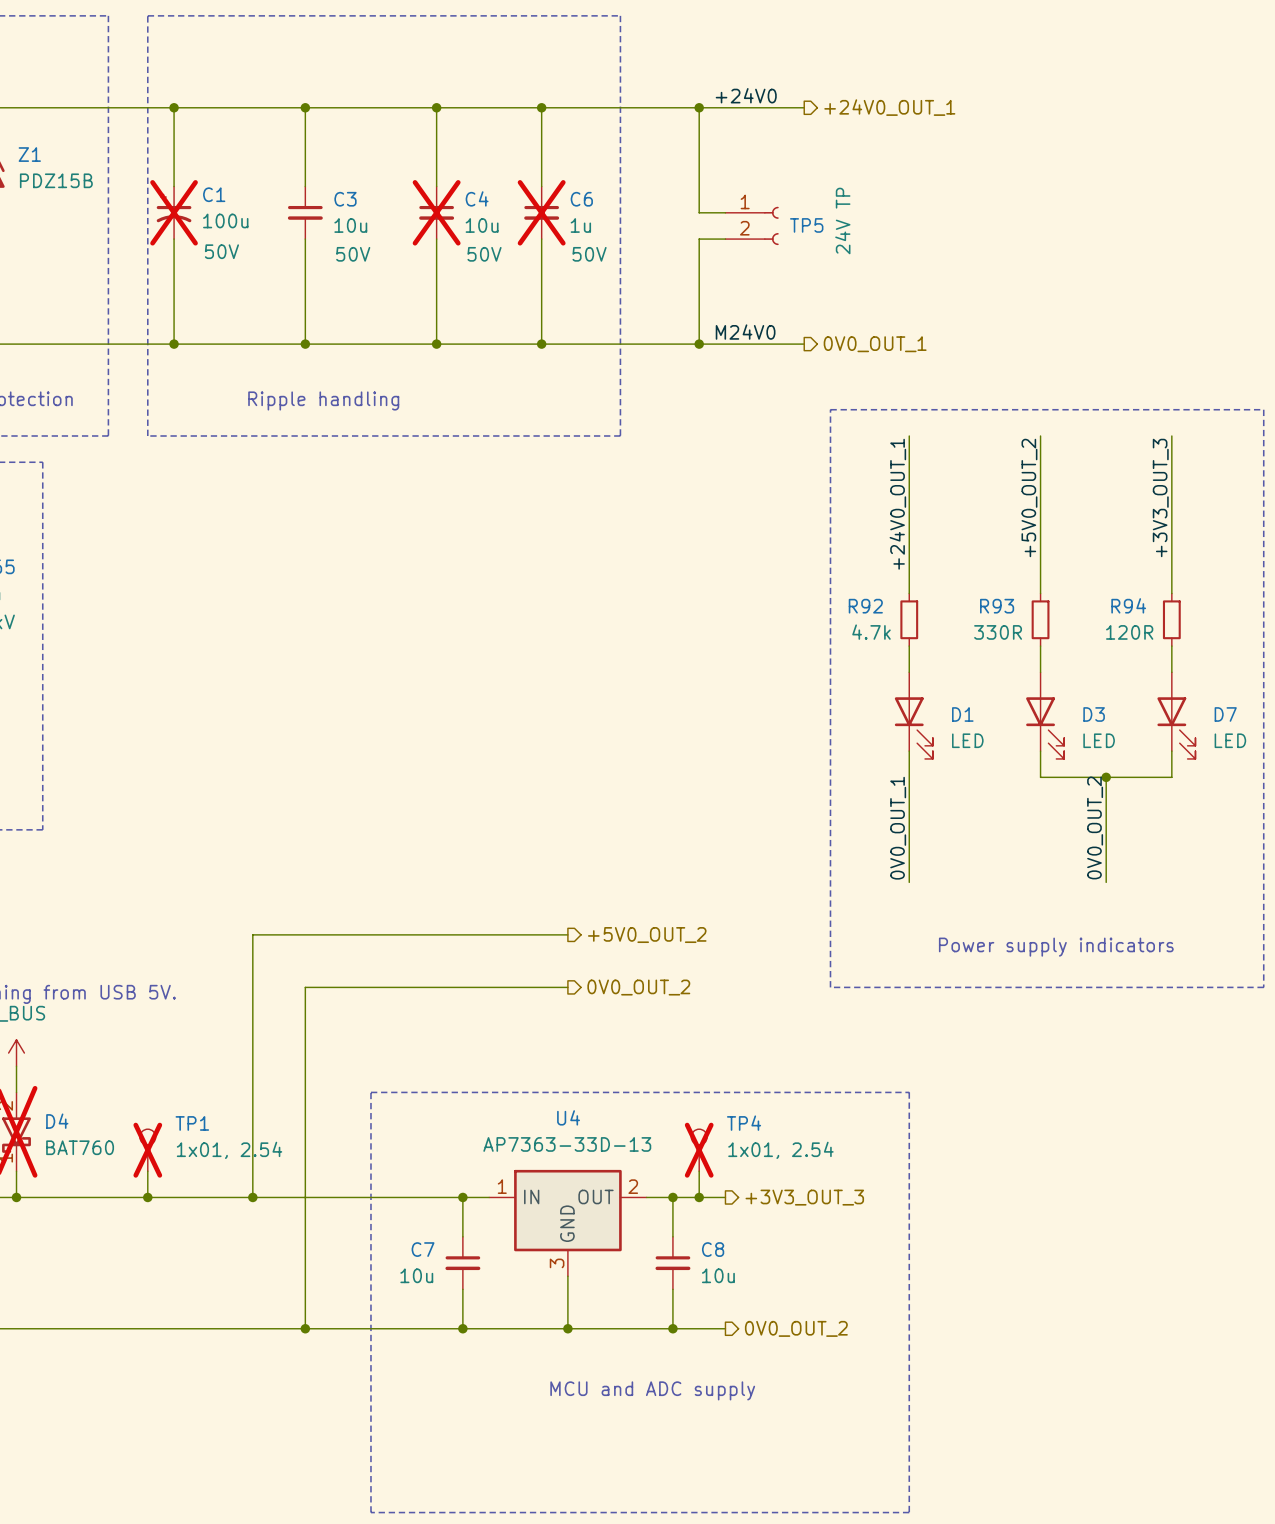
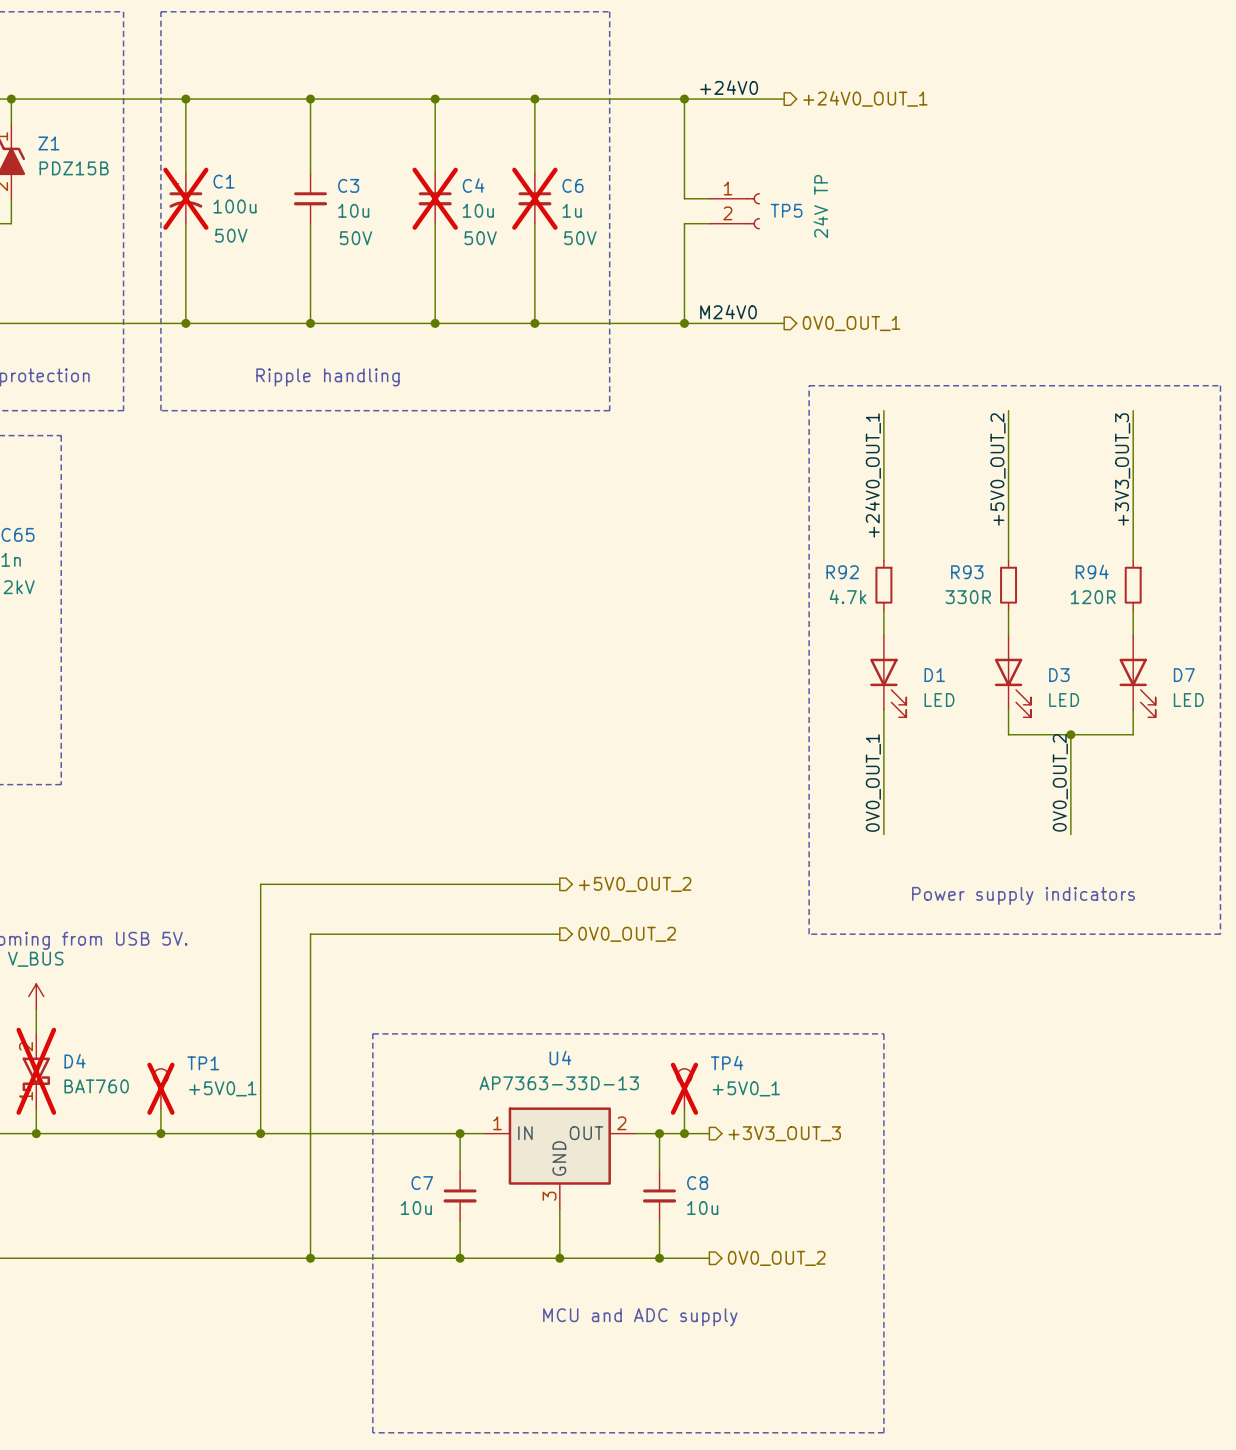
TP1 value: 1x01, 2.54 (229, 1150) -> +5V0_1 (222, 1088)
TP4 value: 1x01, 2.54 (780, 1150) -> +5V0_1 (746, 1088)

